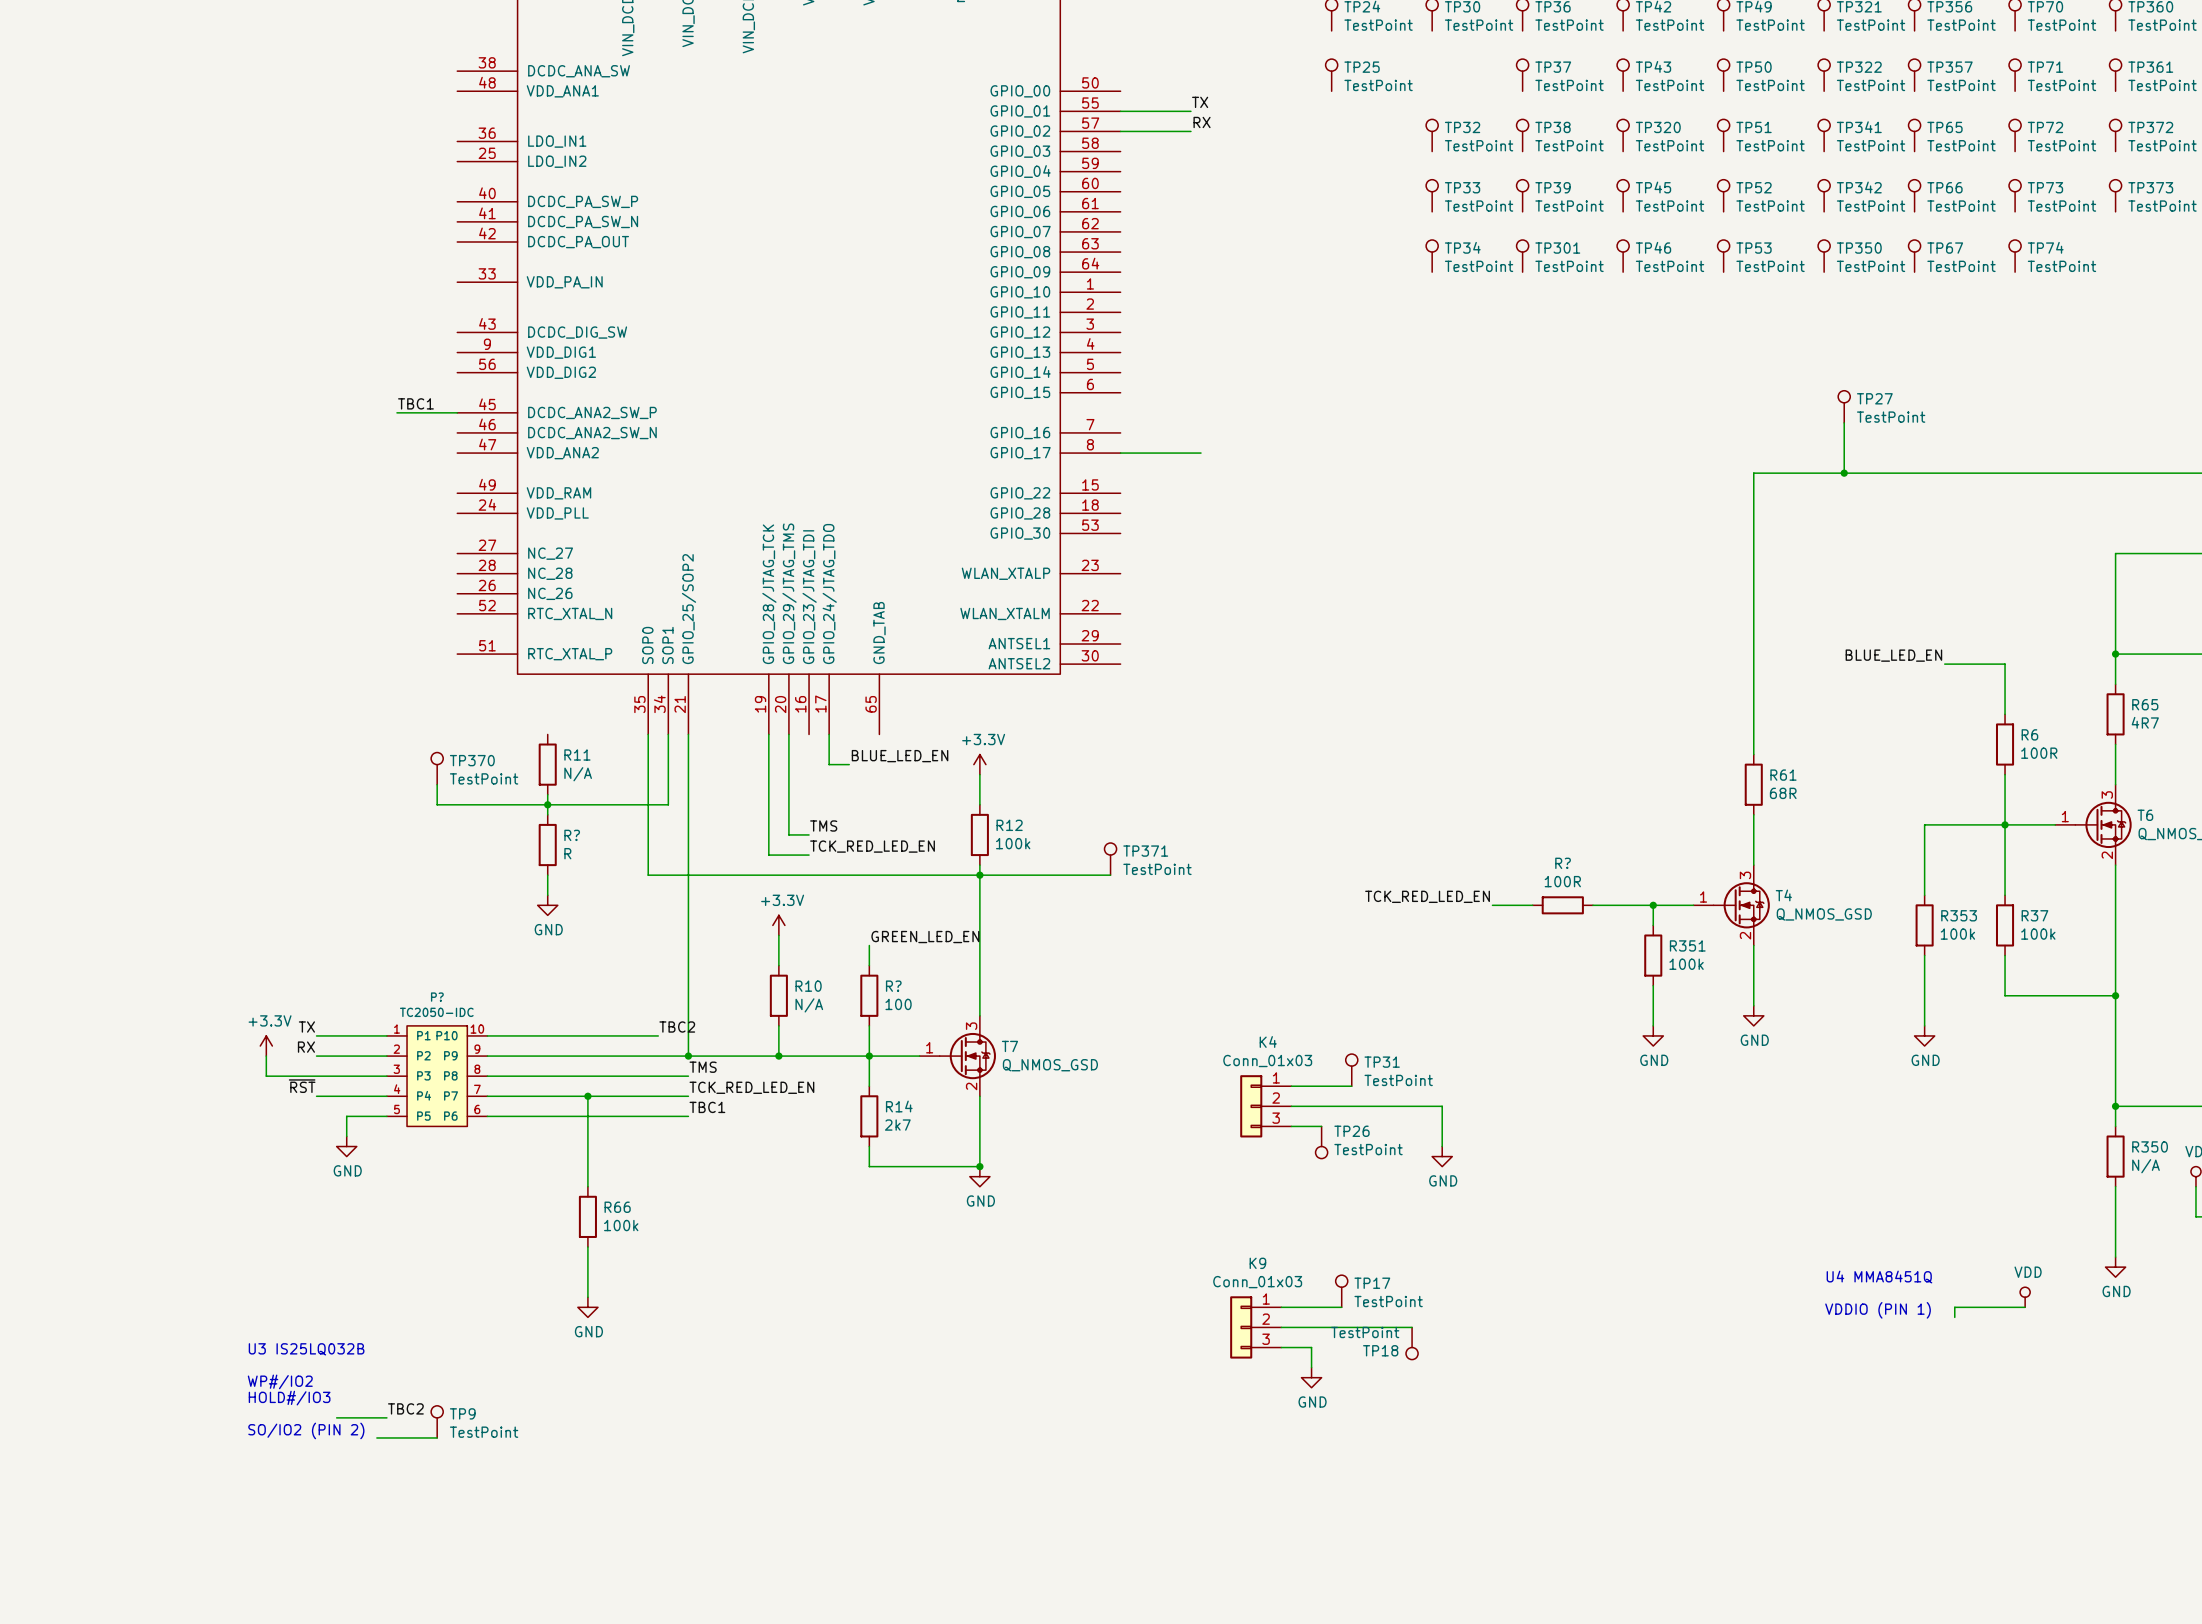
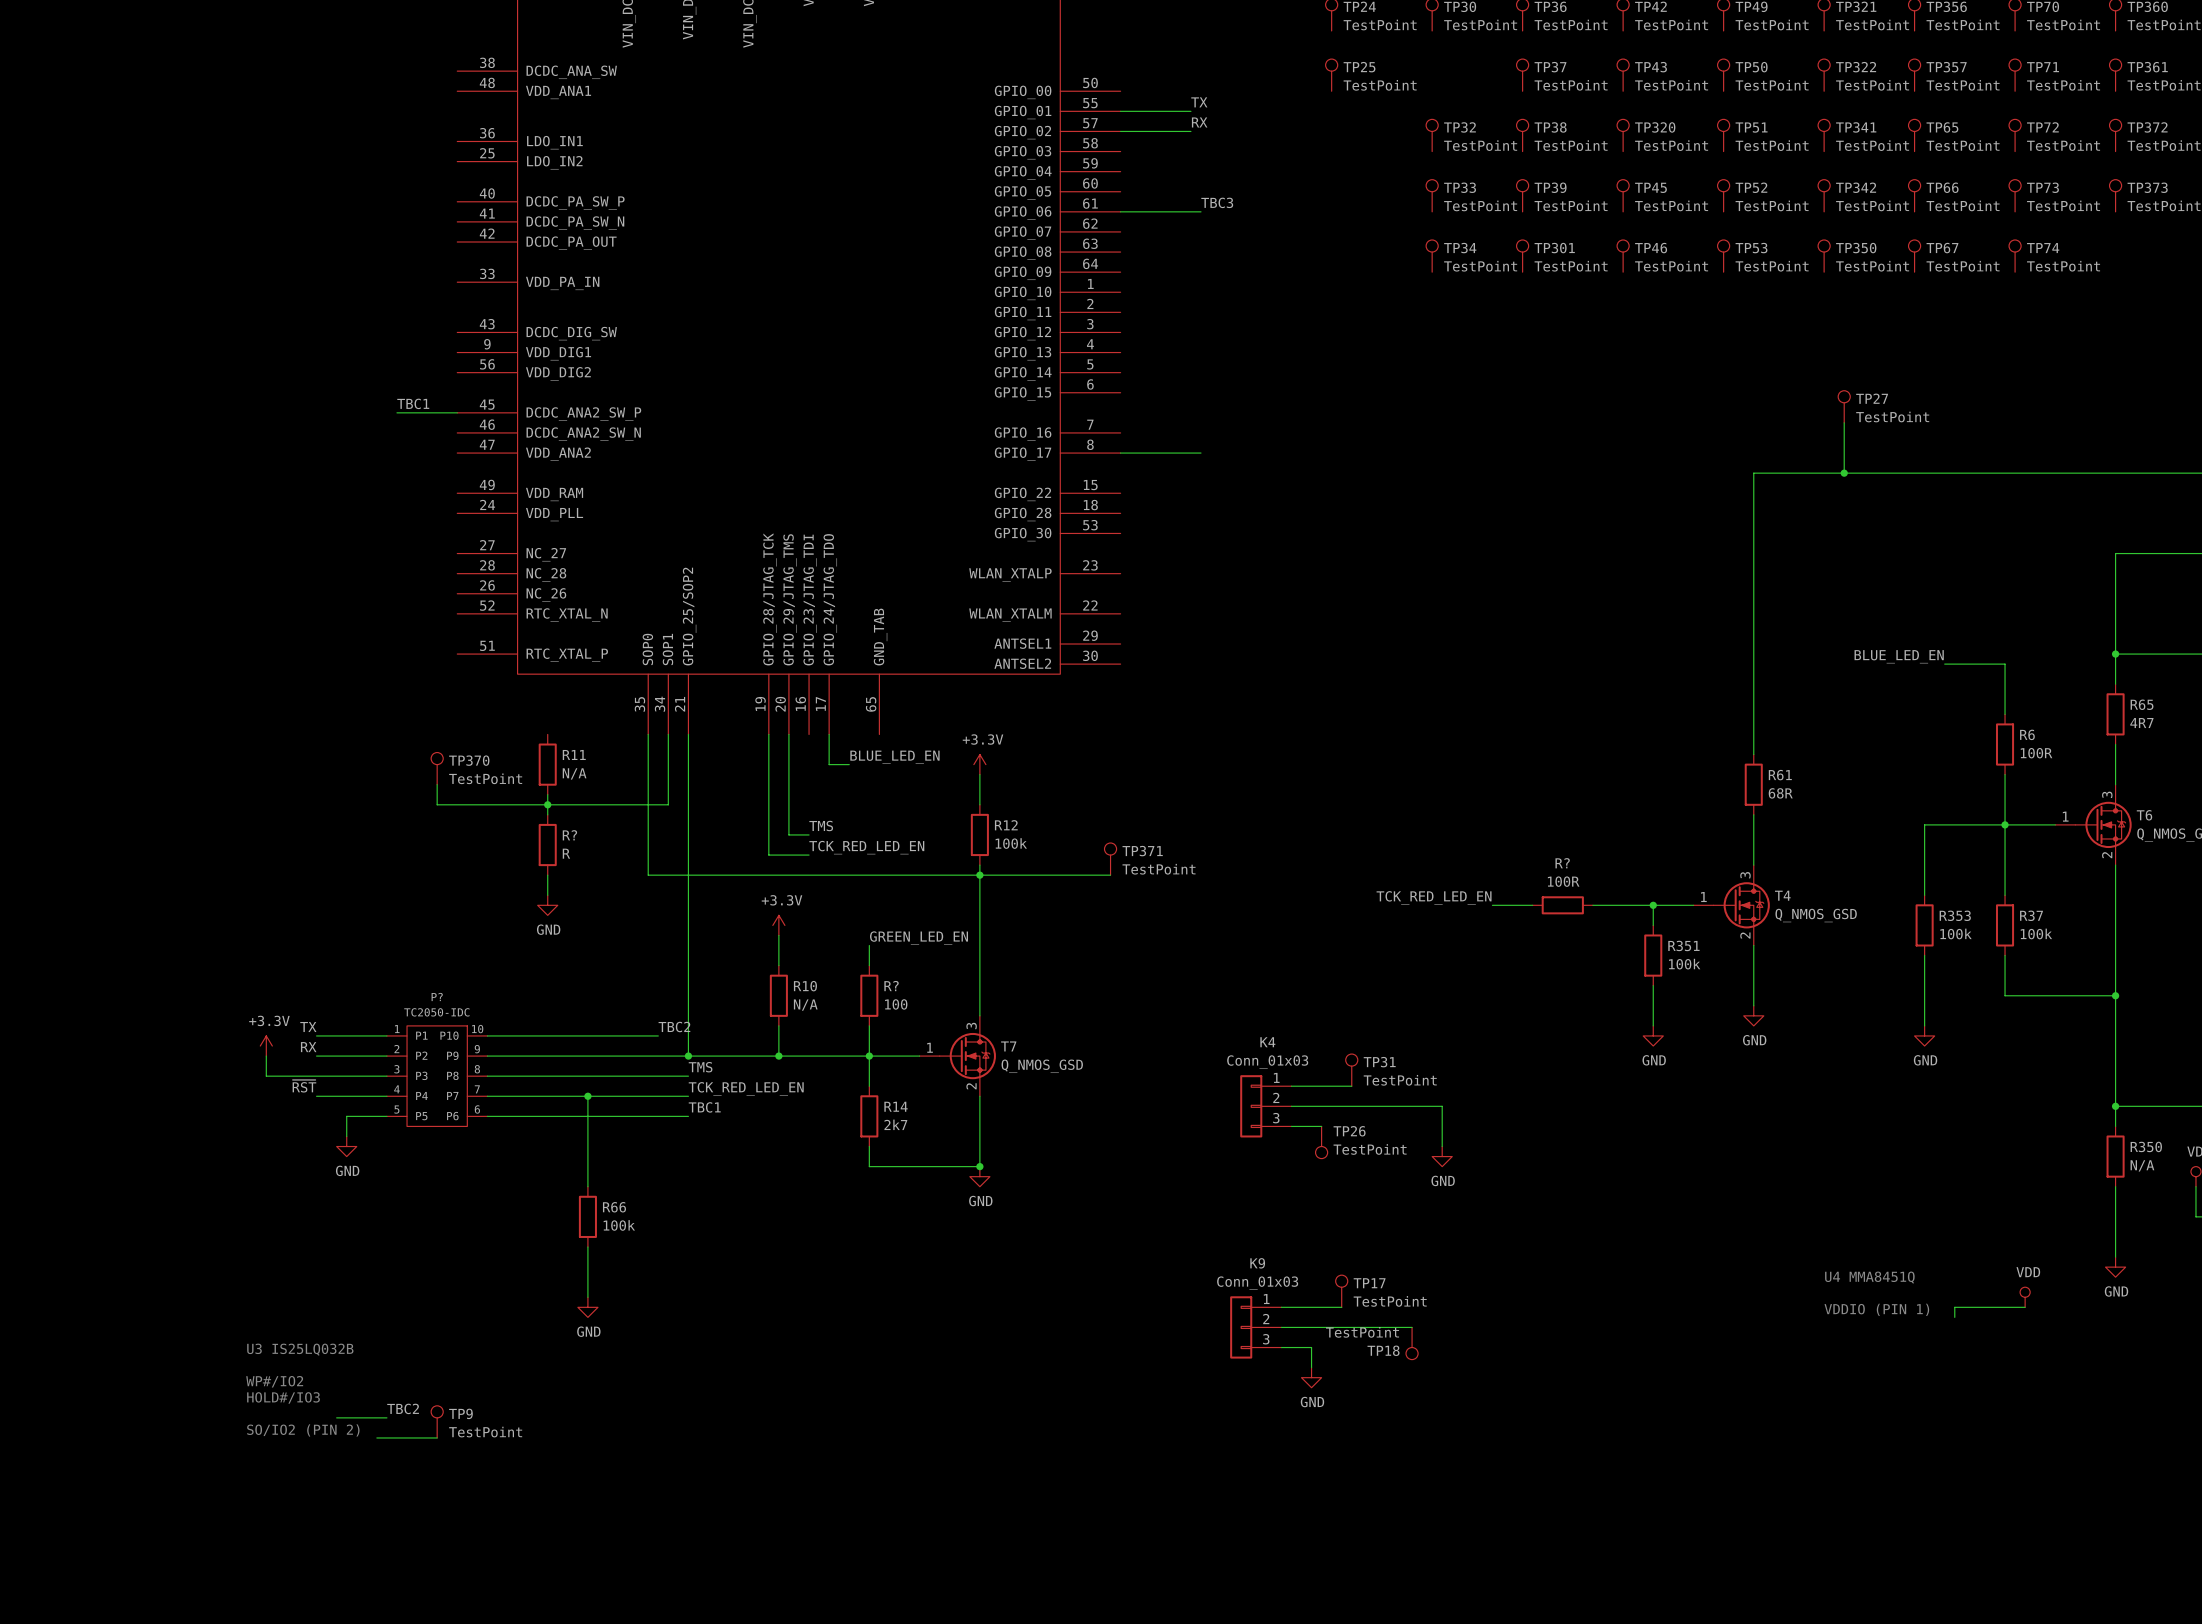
label: none -> TBC3 (1217, 202)
wire: none -> (1120, 211) (1201, 211)

